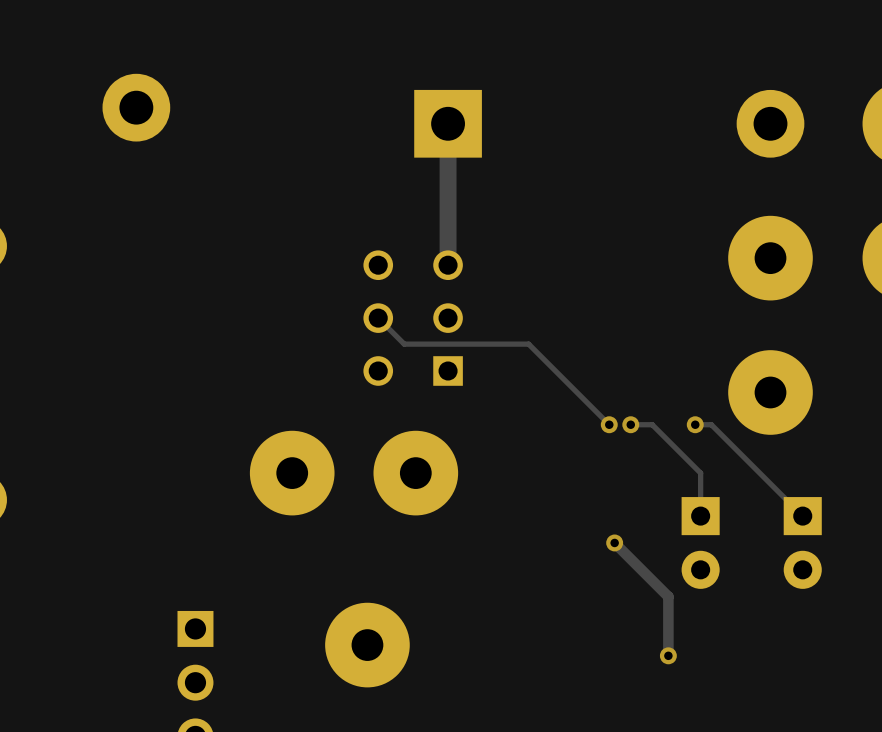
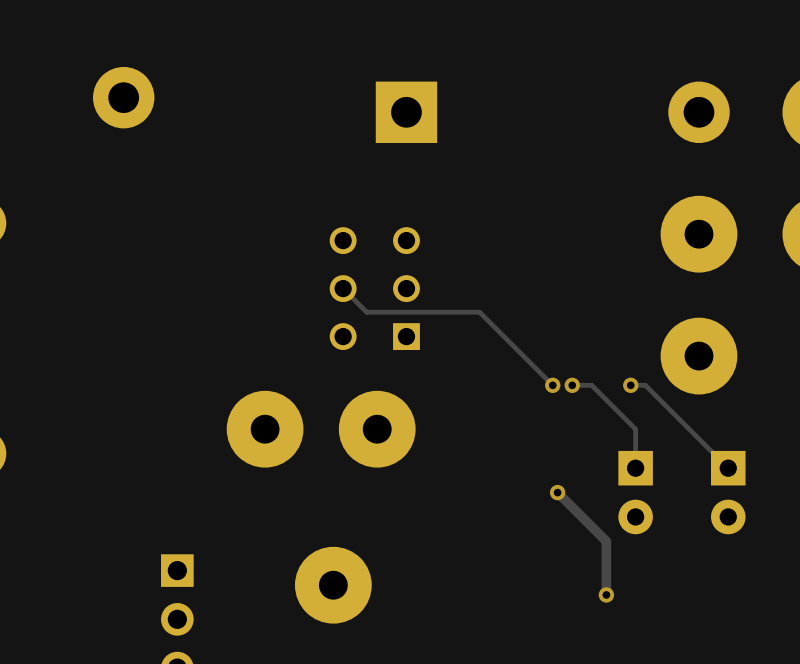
track: (448, 123) (448, 265) -> none

